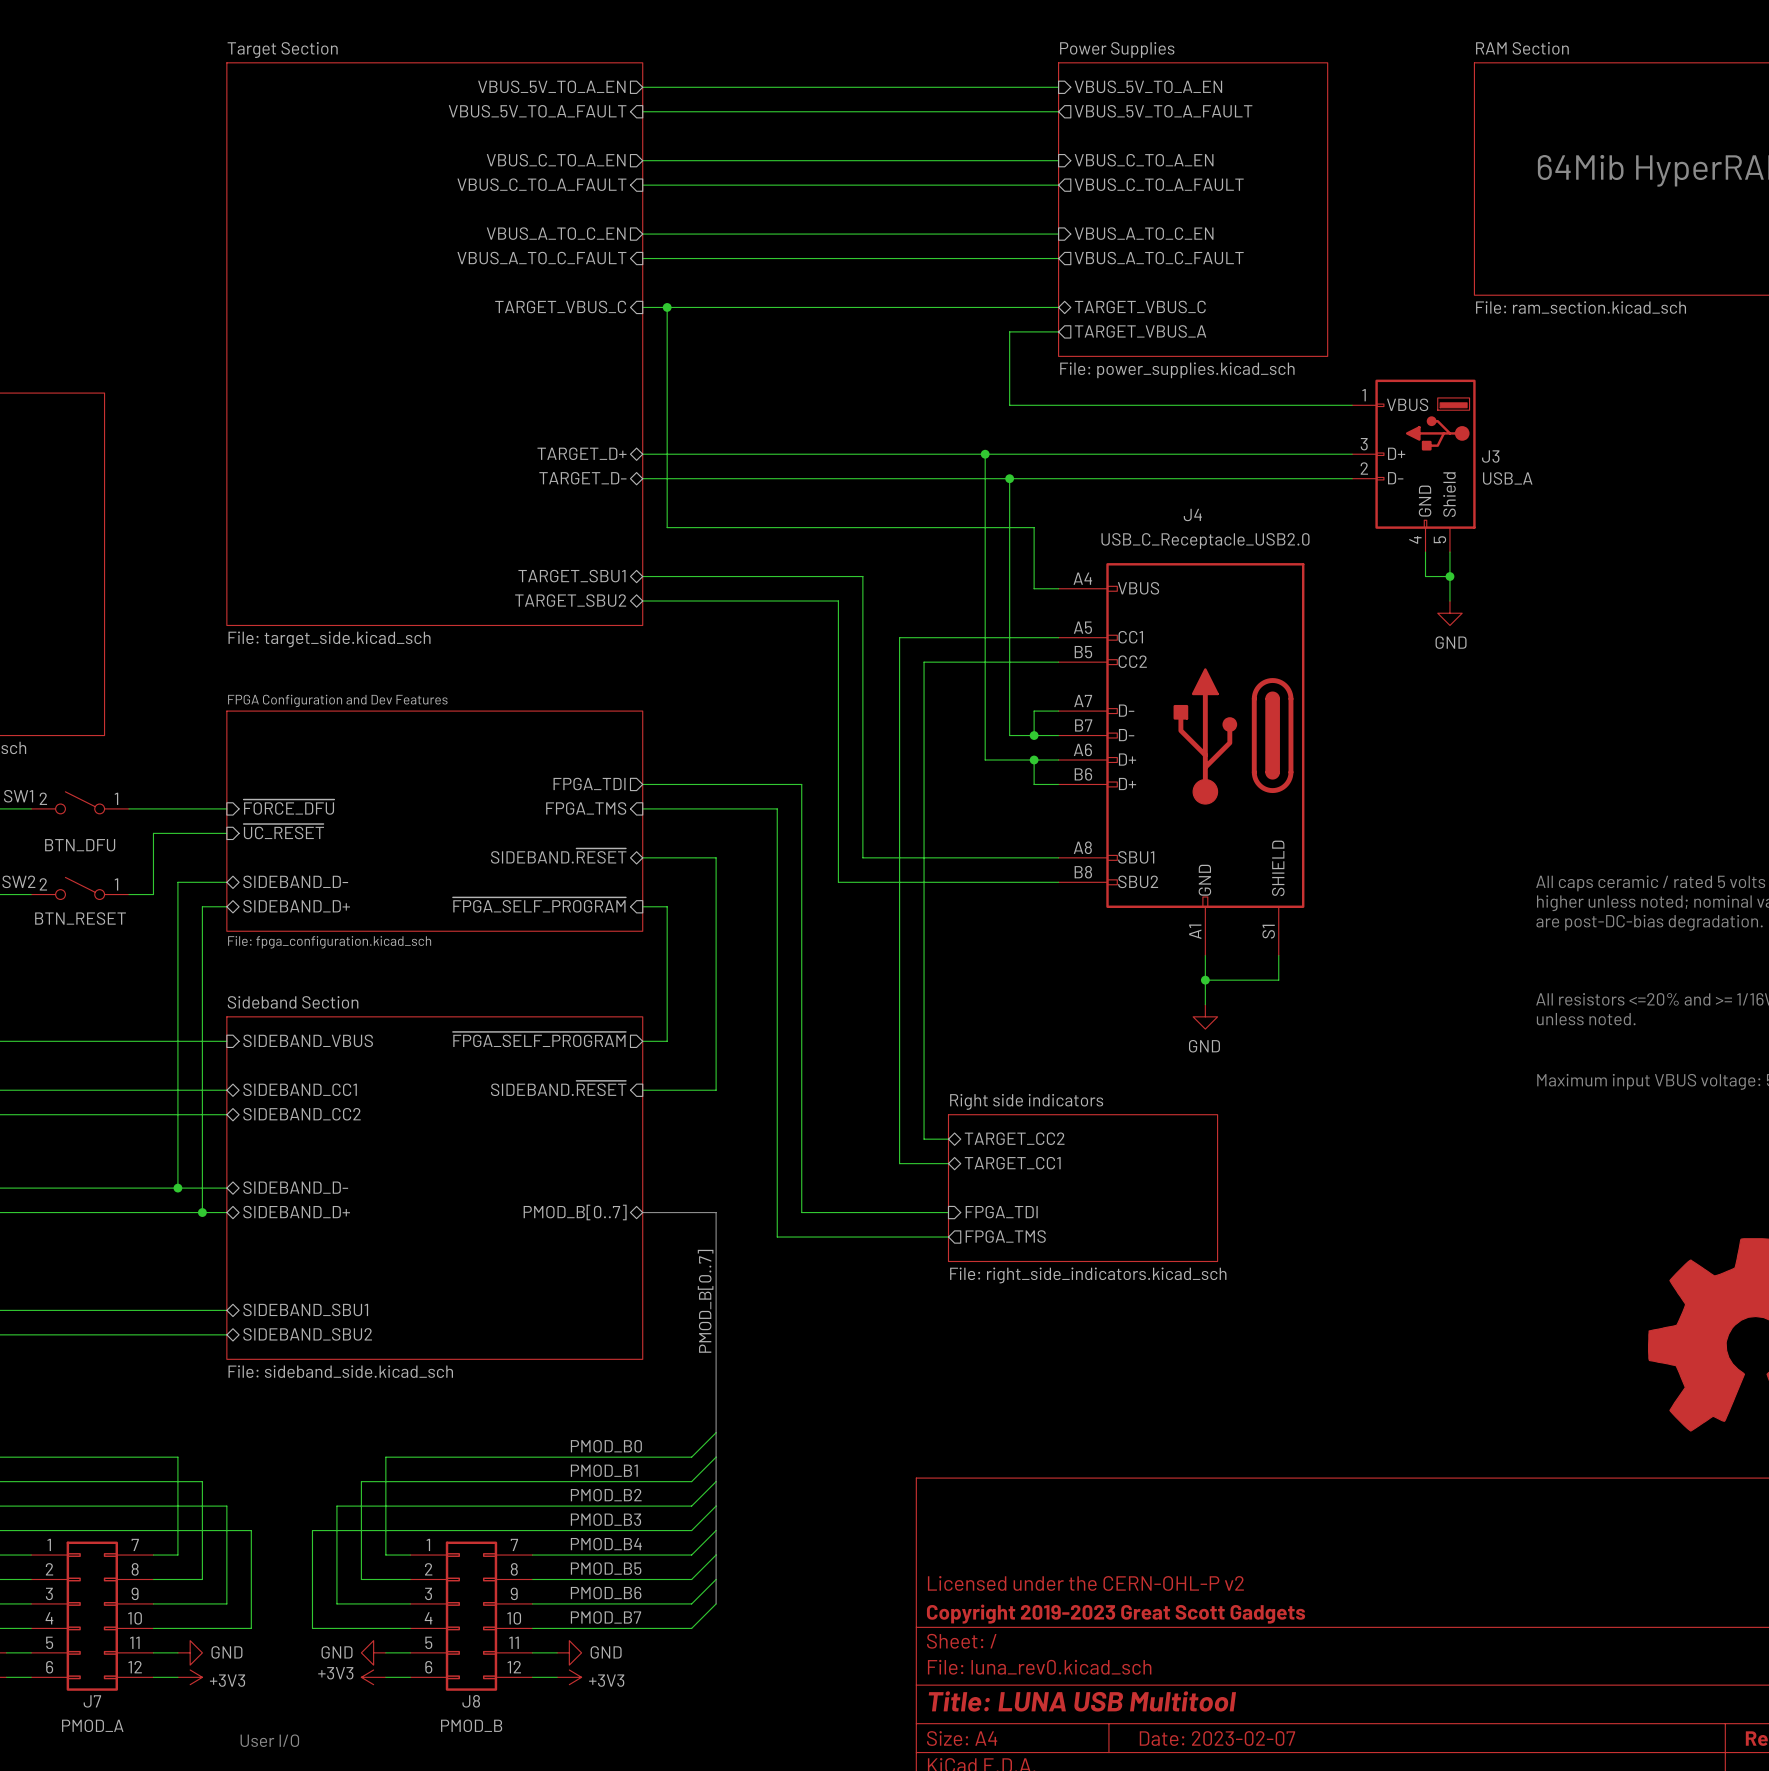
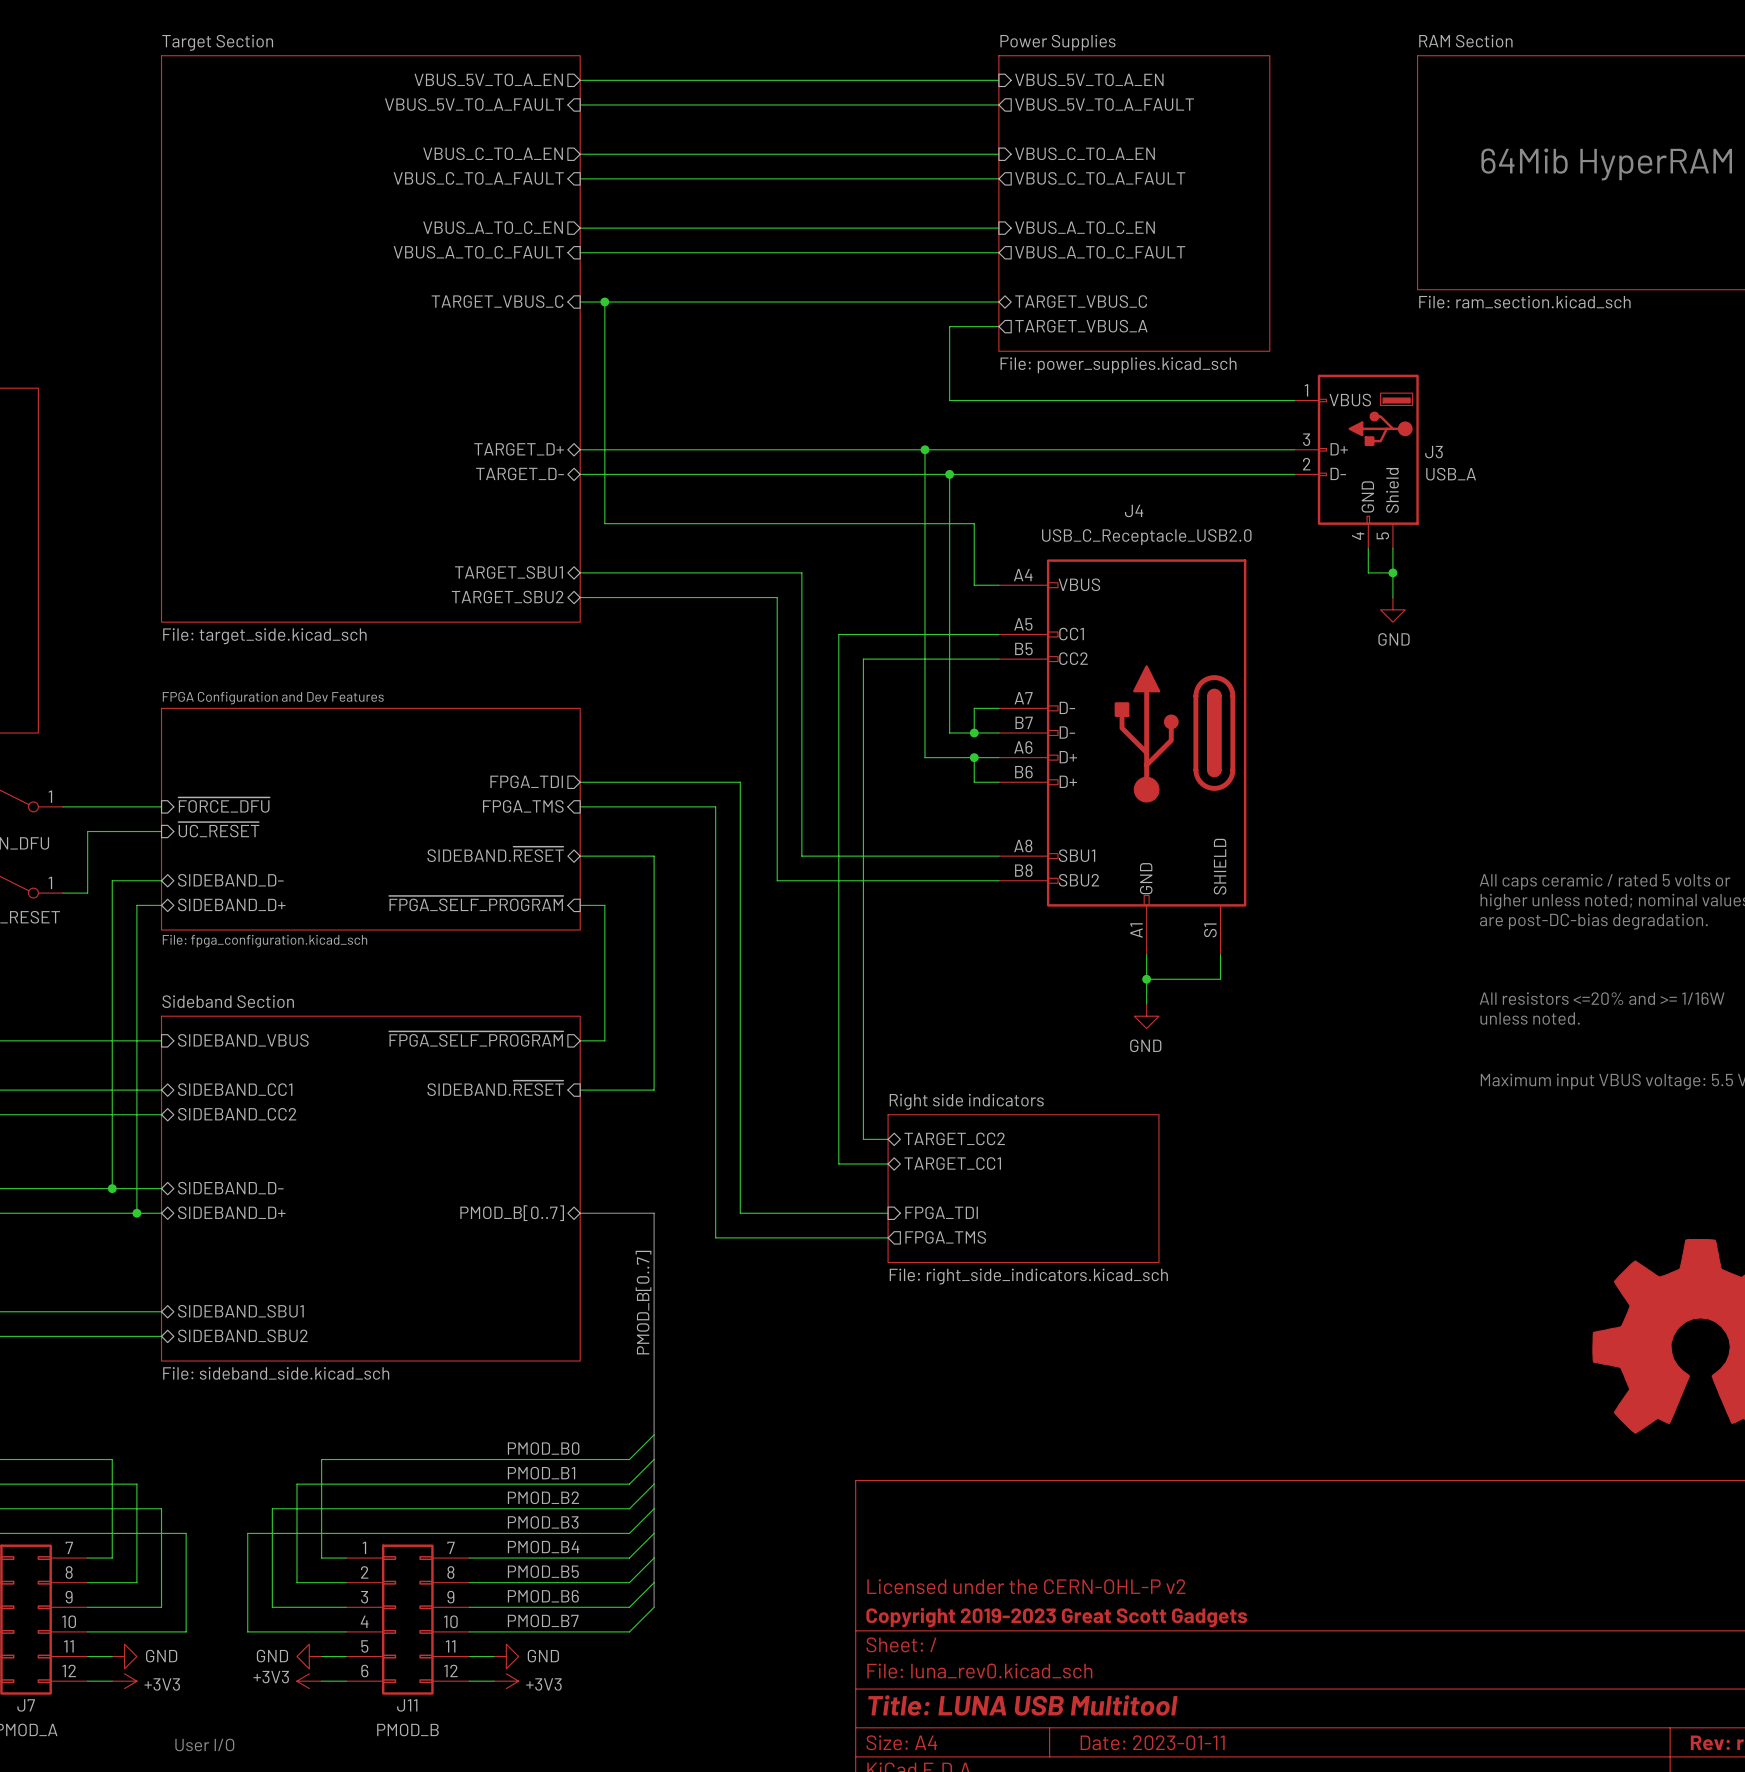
J8 name: J8 (471, 1701) -> J11 (407, 1705)
title block: Date: 2023-02-07 (1217, 1738) -> Date: 2023-01-11 (1152, 1742)

